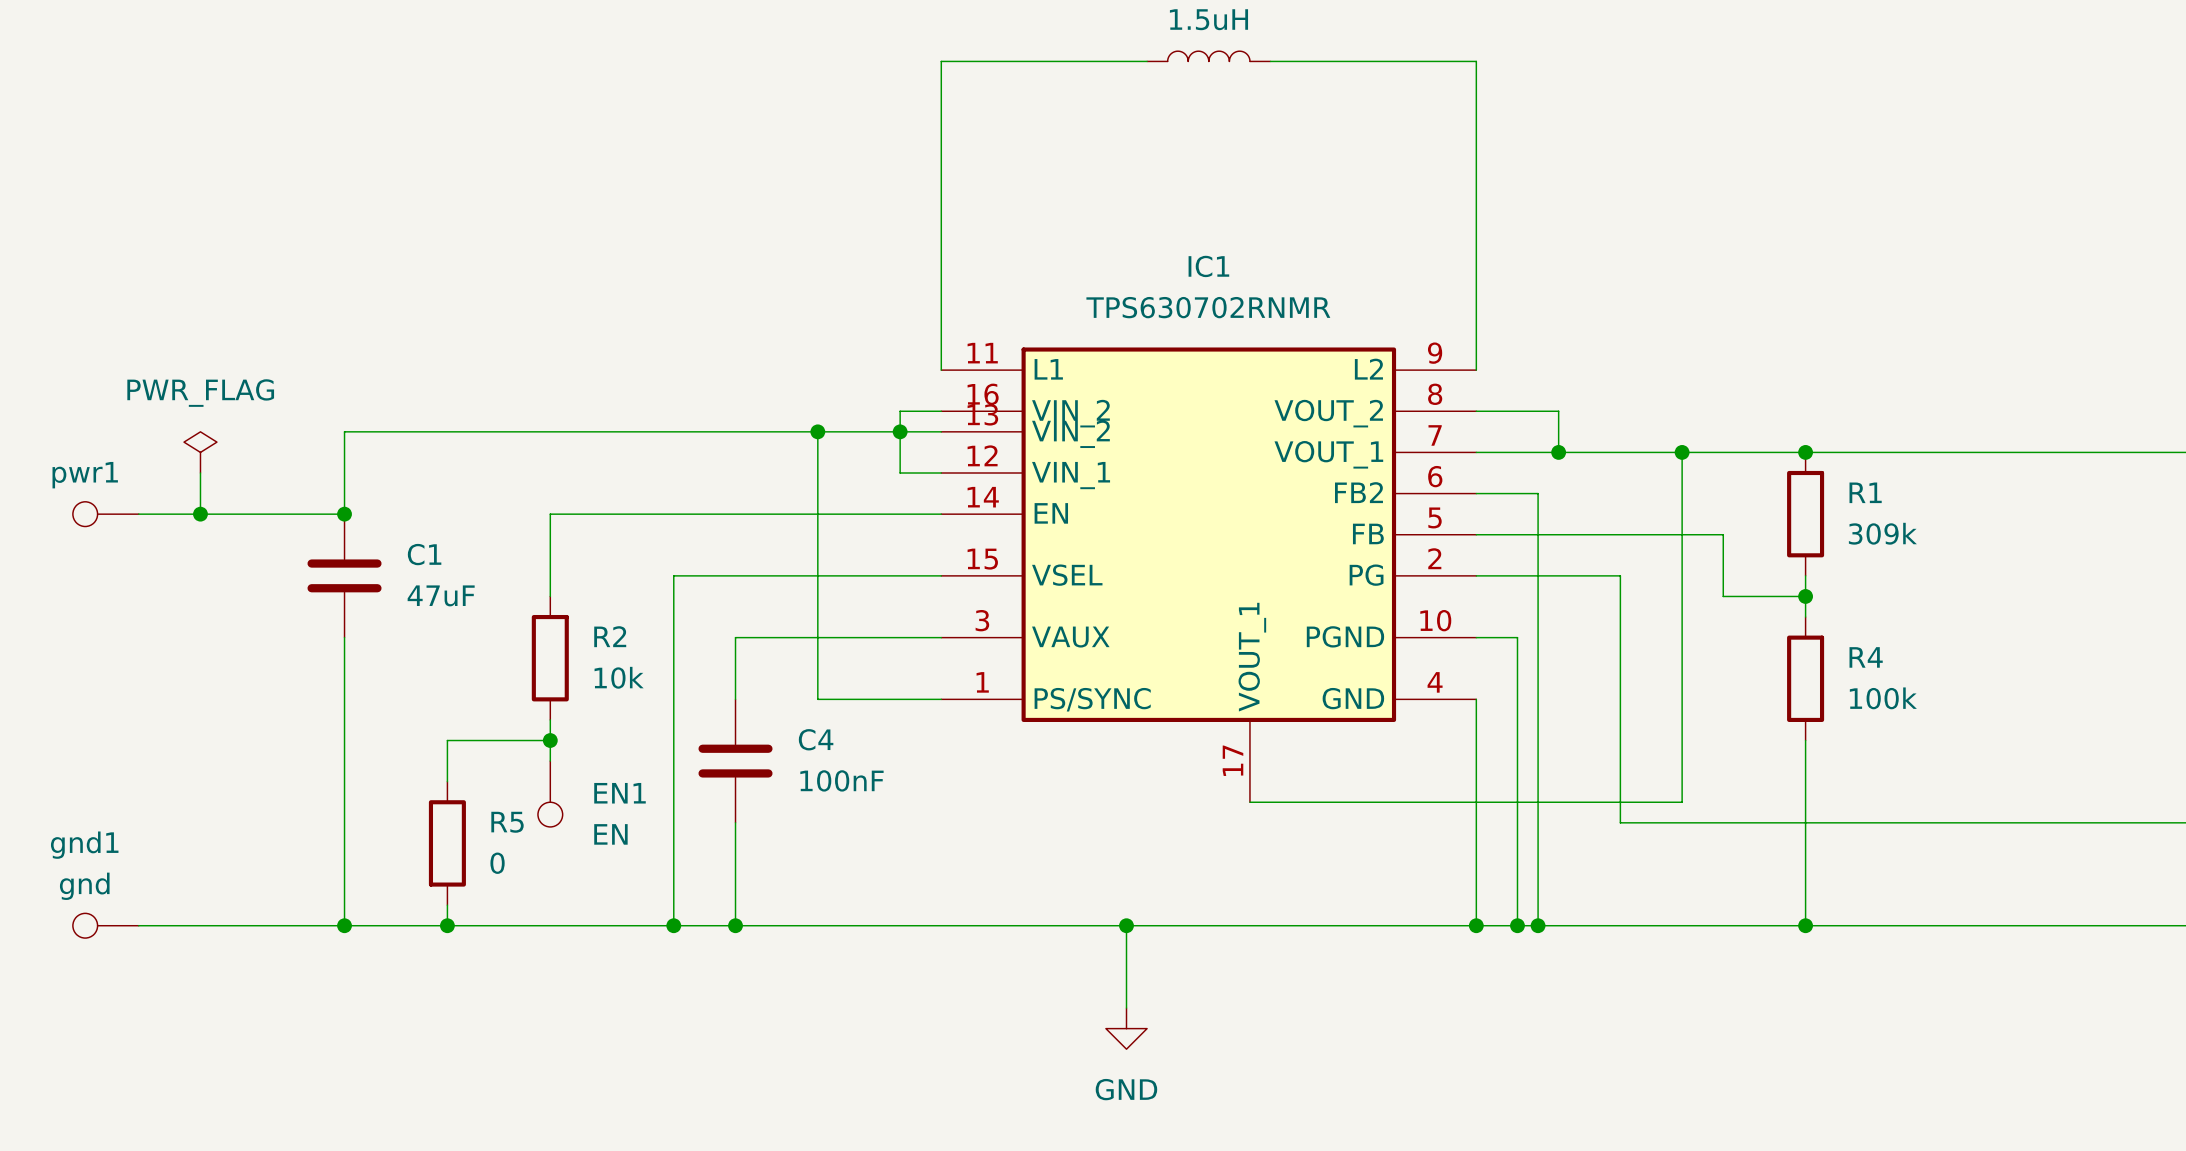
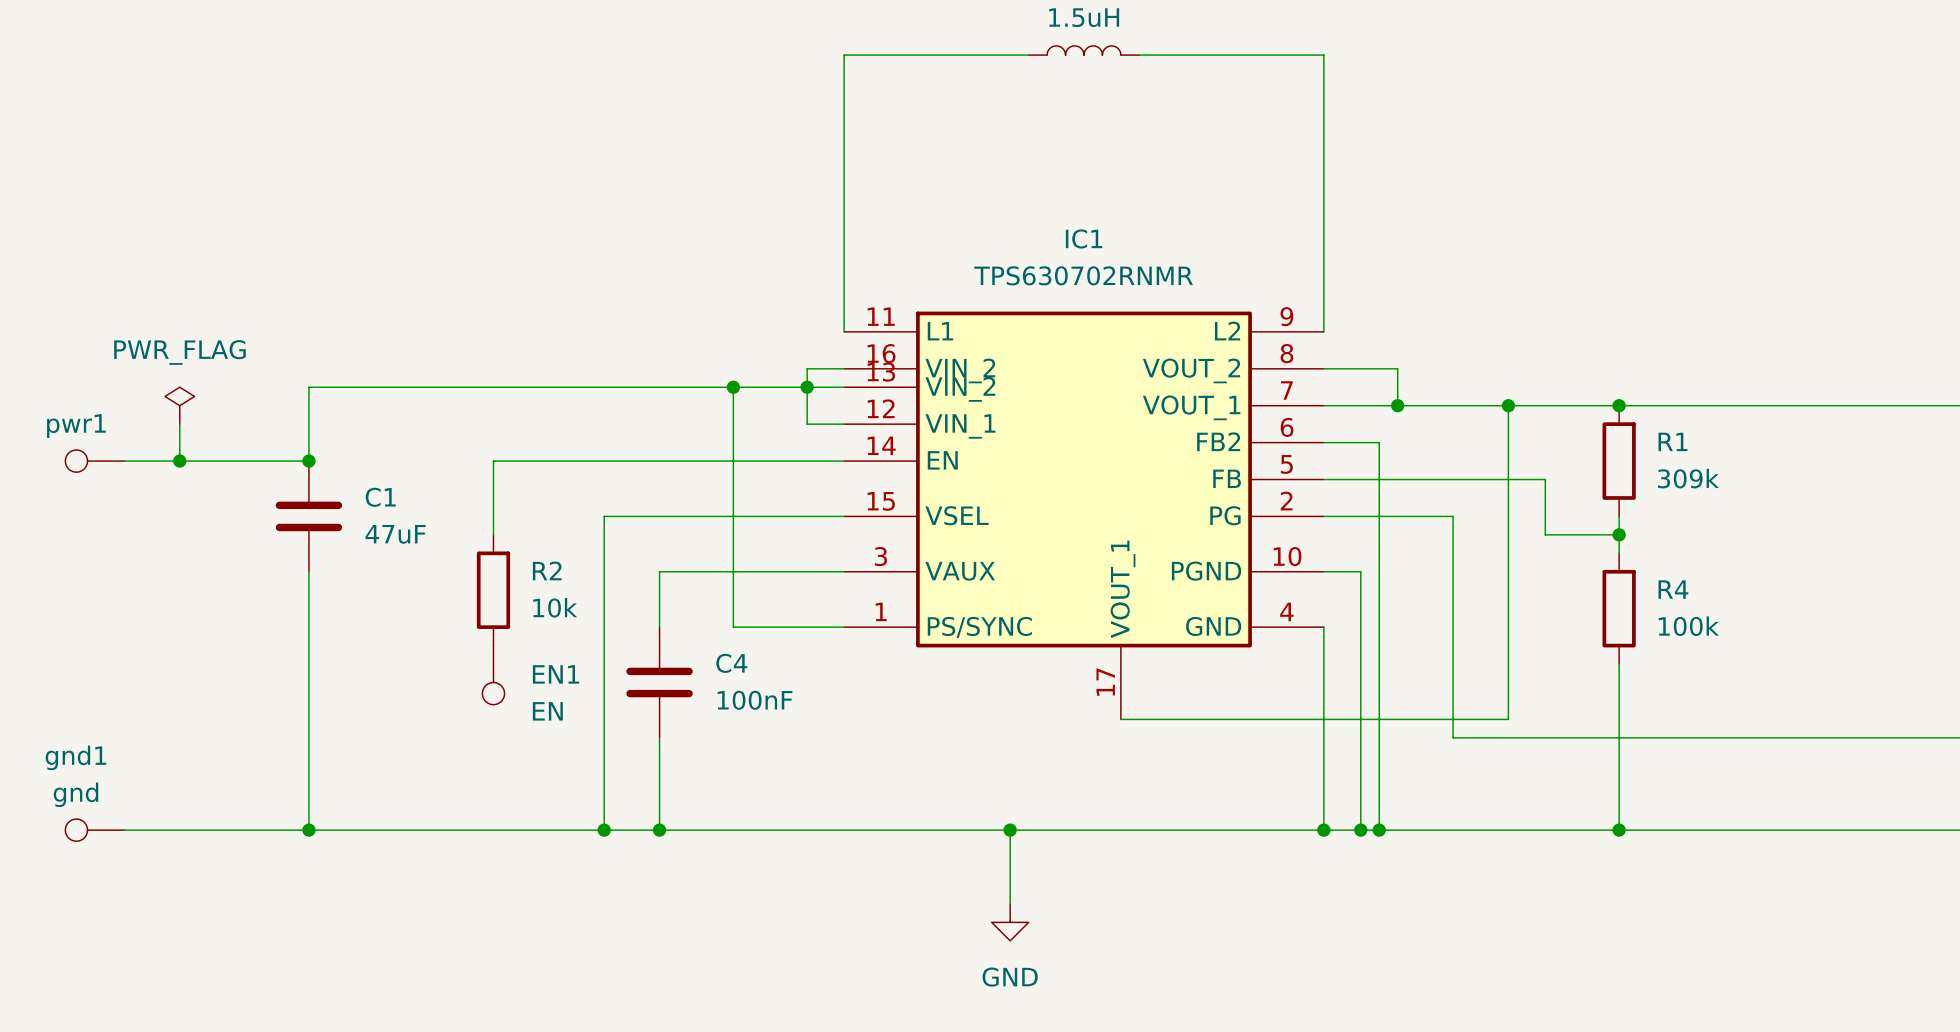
wire: (550, 740) (447, 740) (447, 781) -> none
junction: (550, 740) -> none
EN1 position: (550, 794) -> (493, 675)
R5: 0 (447, 843) -> none
wire: (447, 905) (447, 925) -> none
junction: (447, 925) -> none

